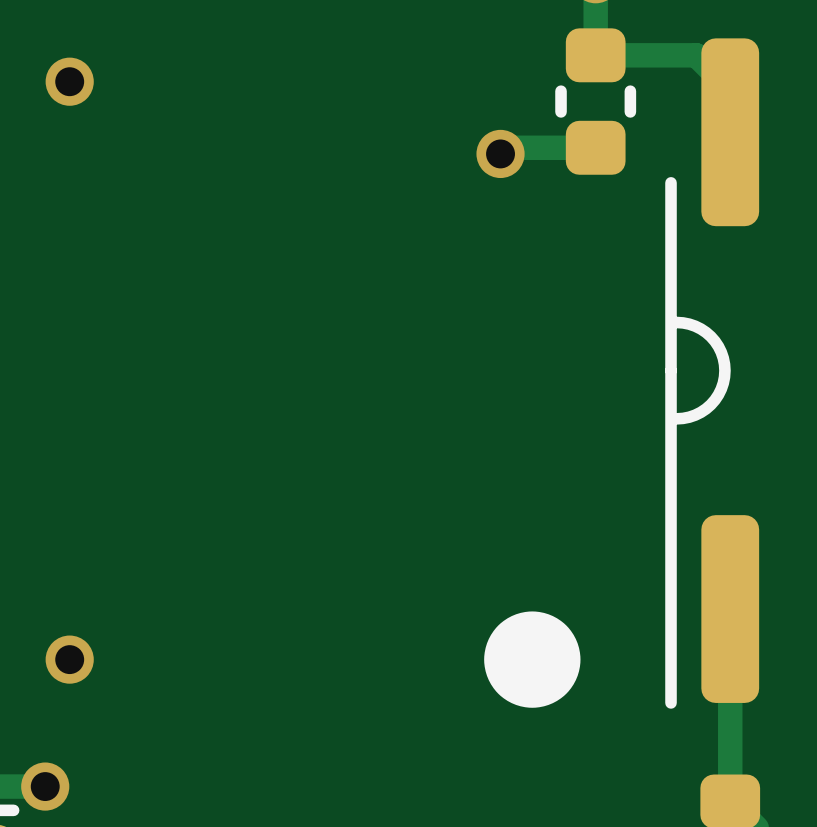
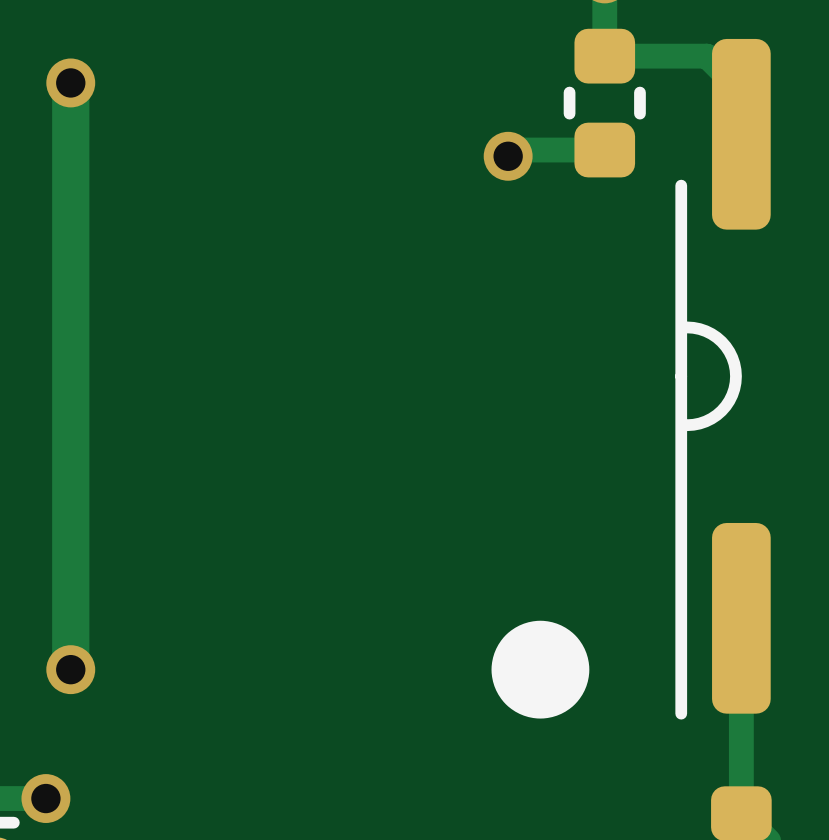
track: none -> (70, 82) (70, 669)

